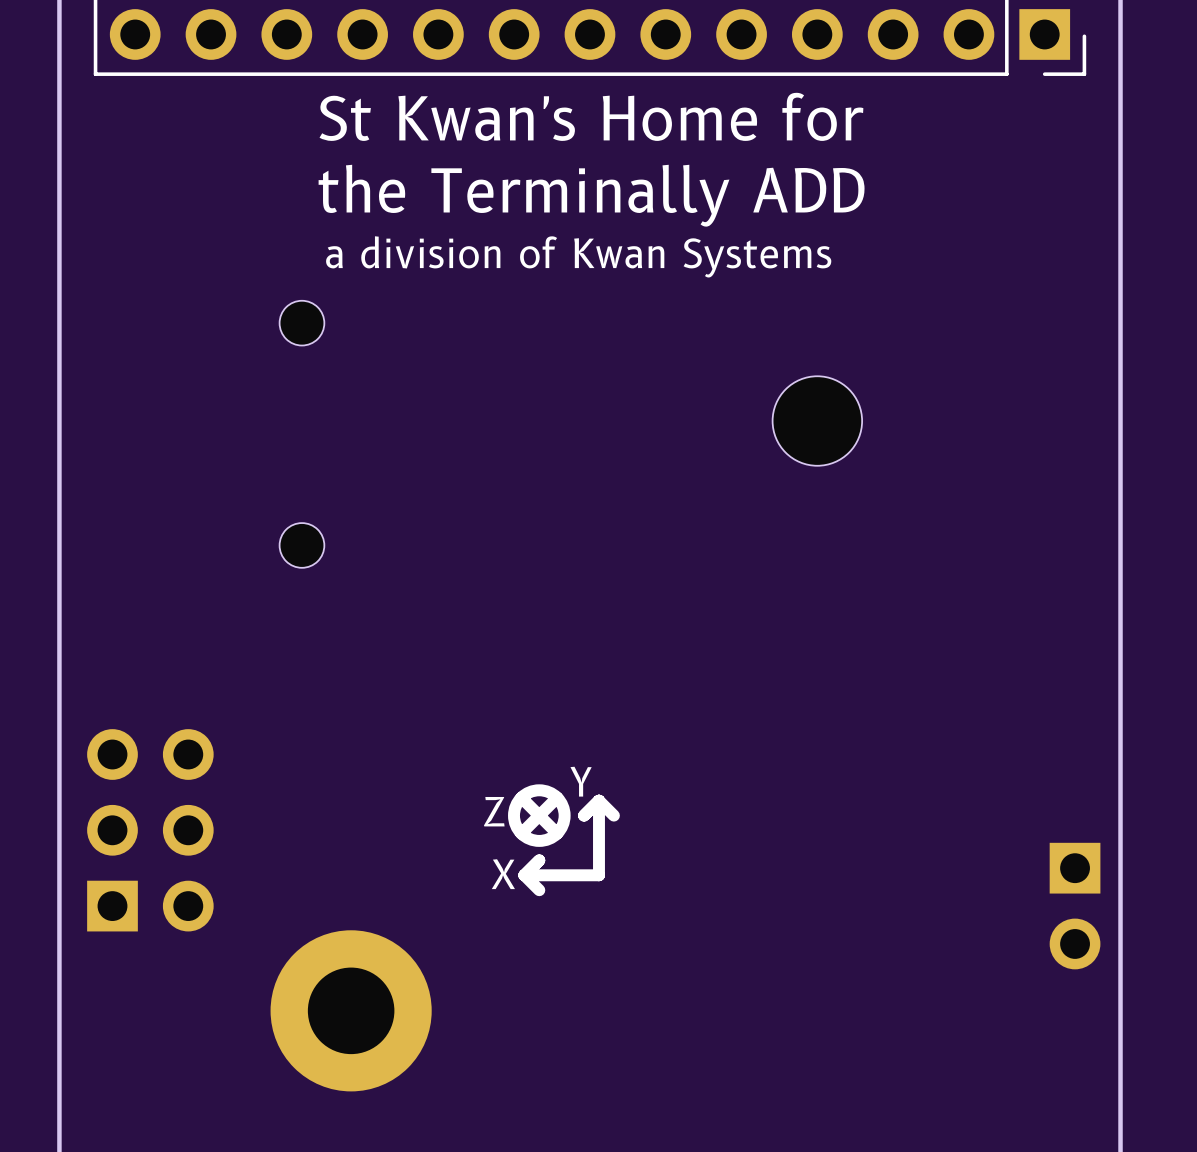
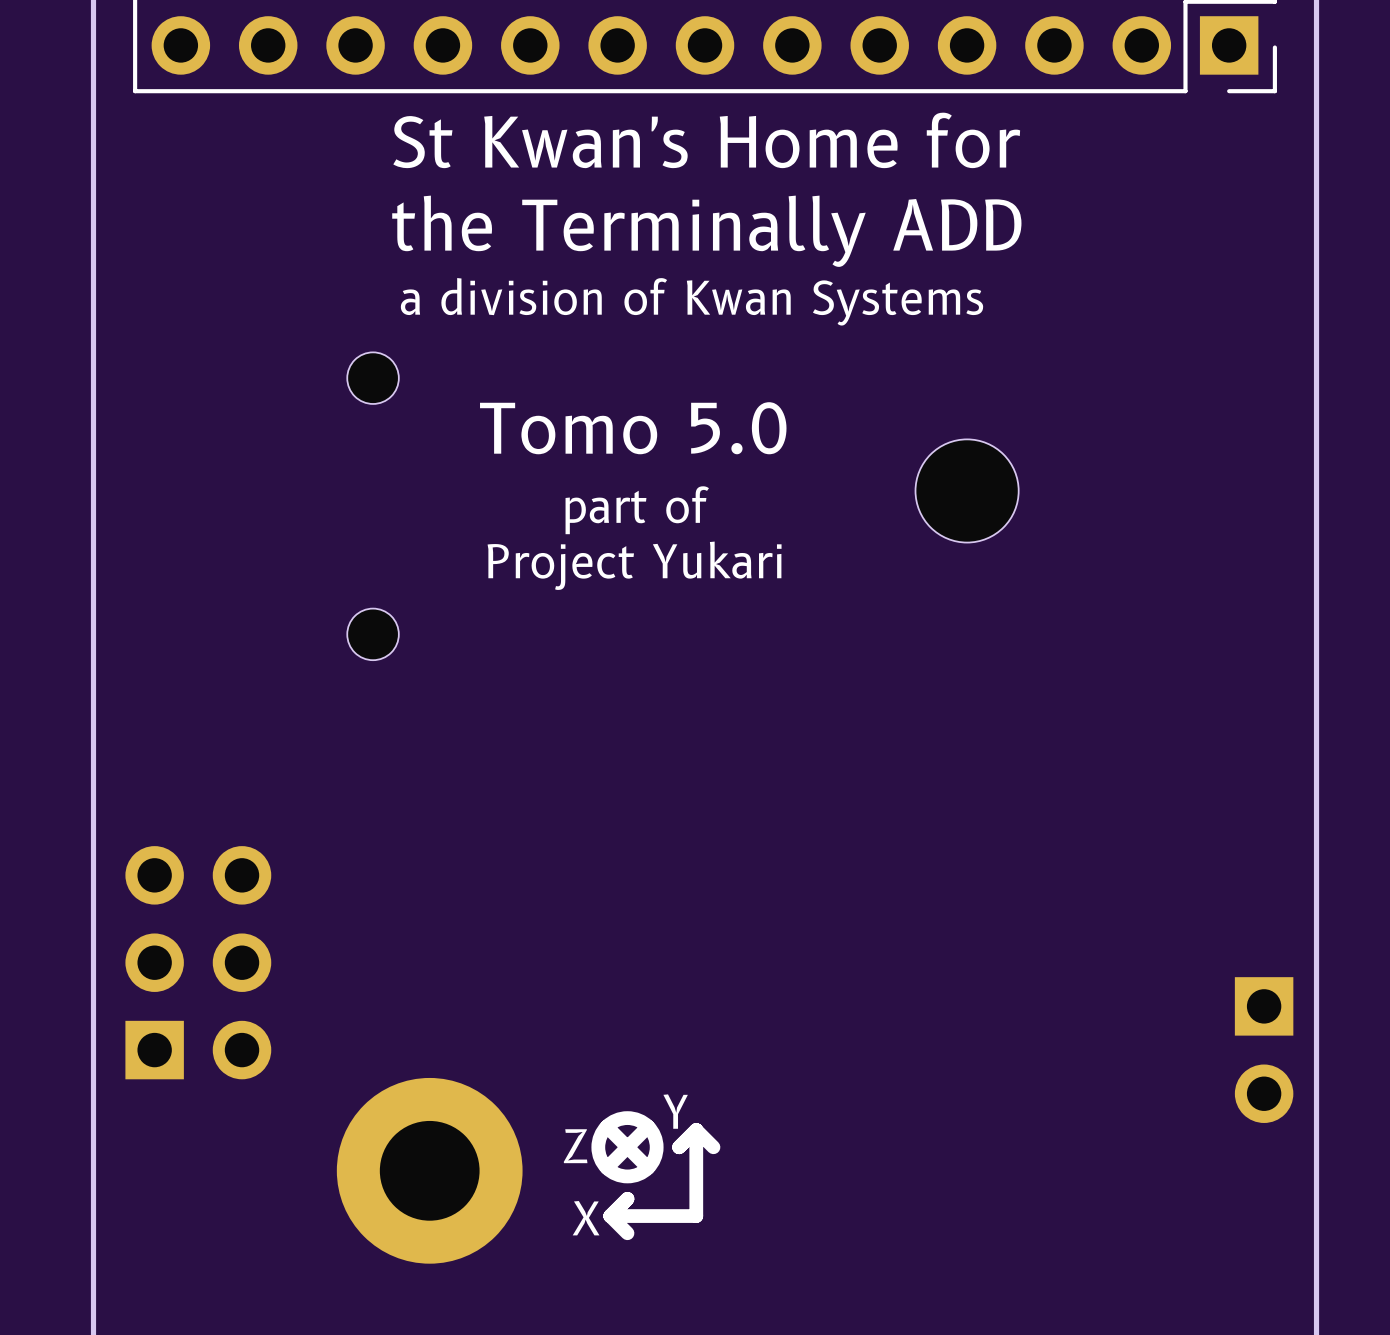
text: none -> Tomo 5.0 (633, 428)
text: none -> part of (637, 510)
text: none -> Project Yukari (634, 565)
part: (563, 840) -> none
drawing: none -> [591, 1111, 721, 1241]

